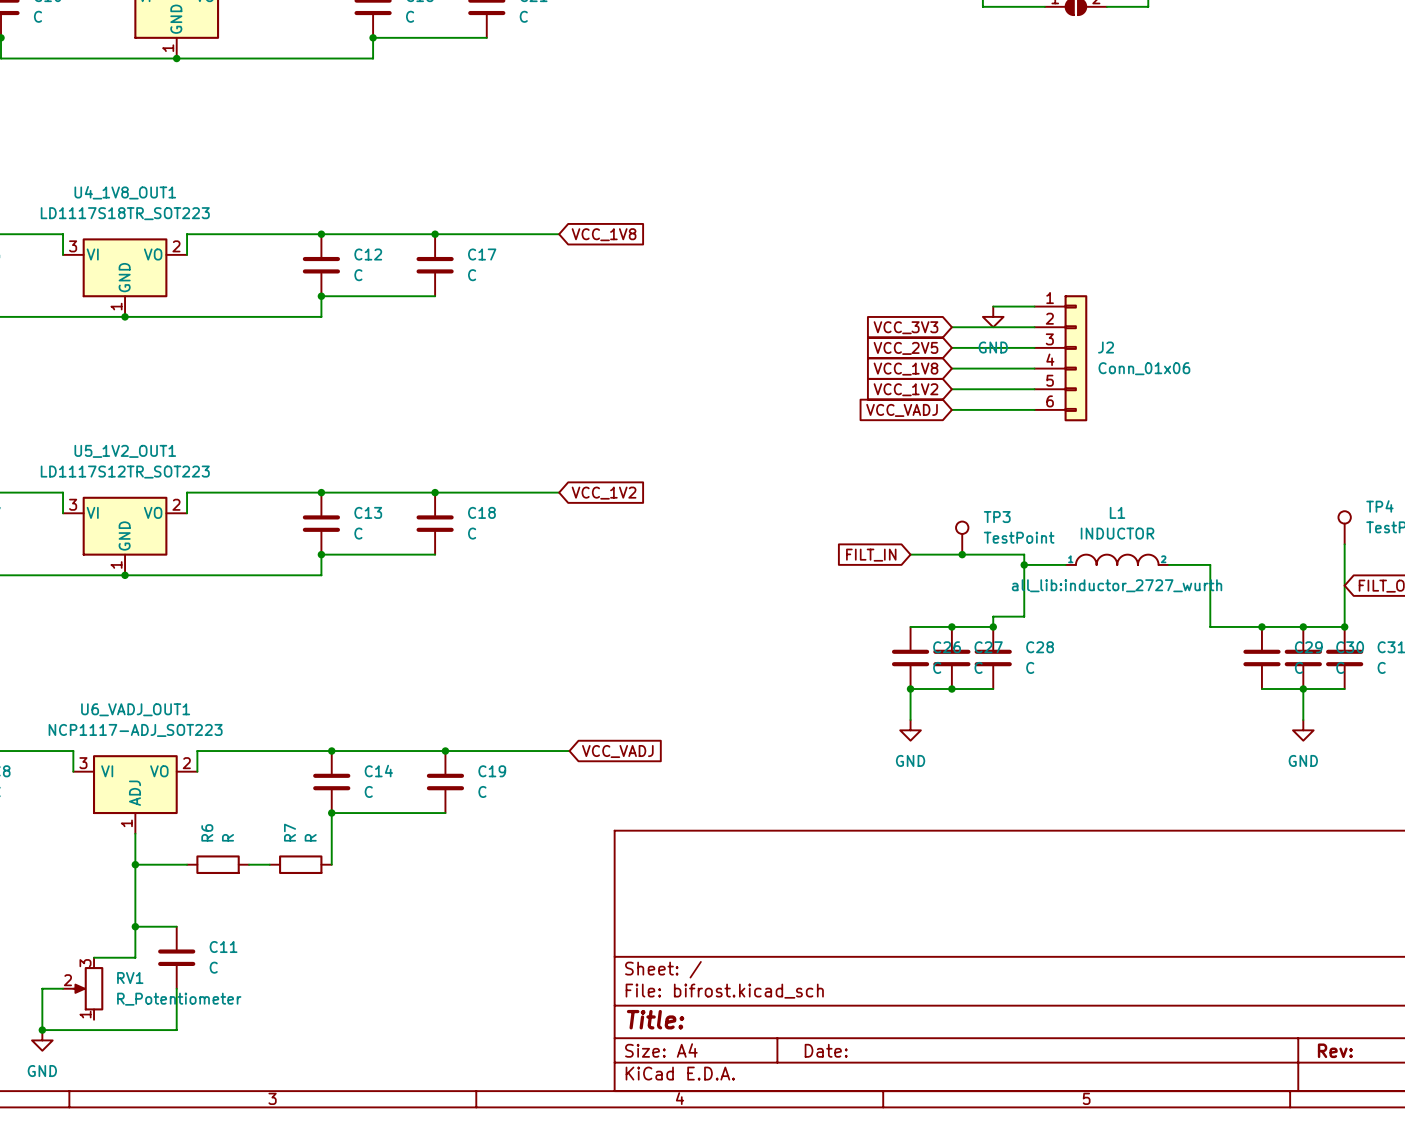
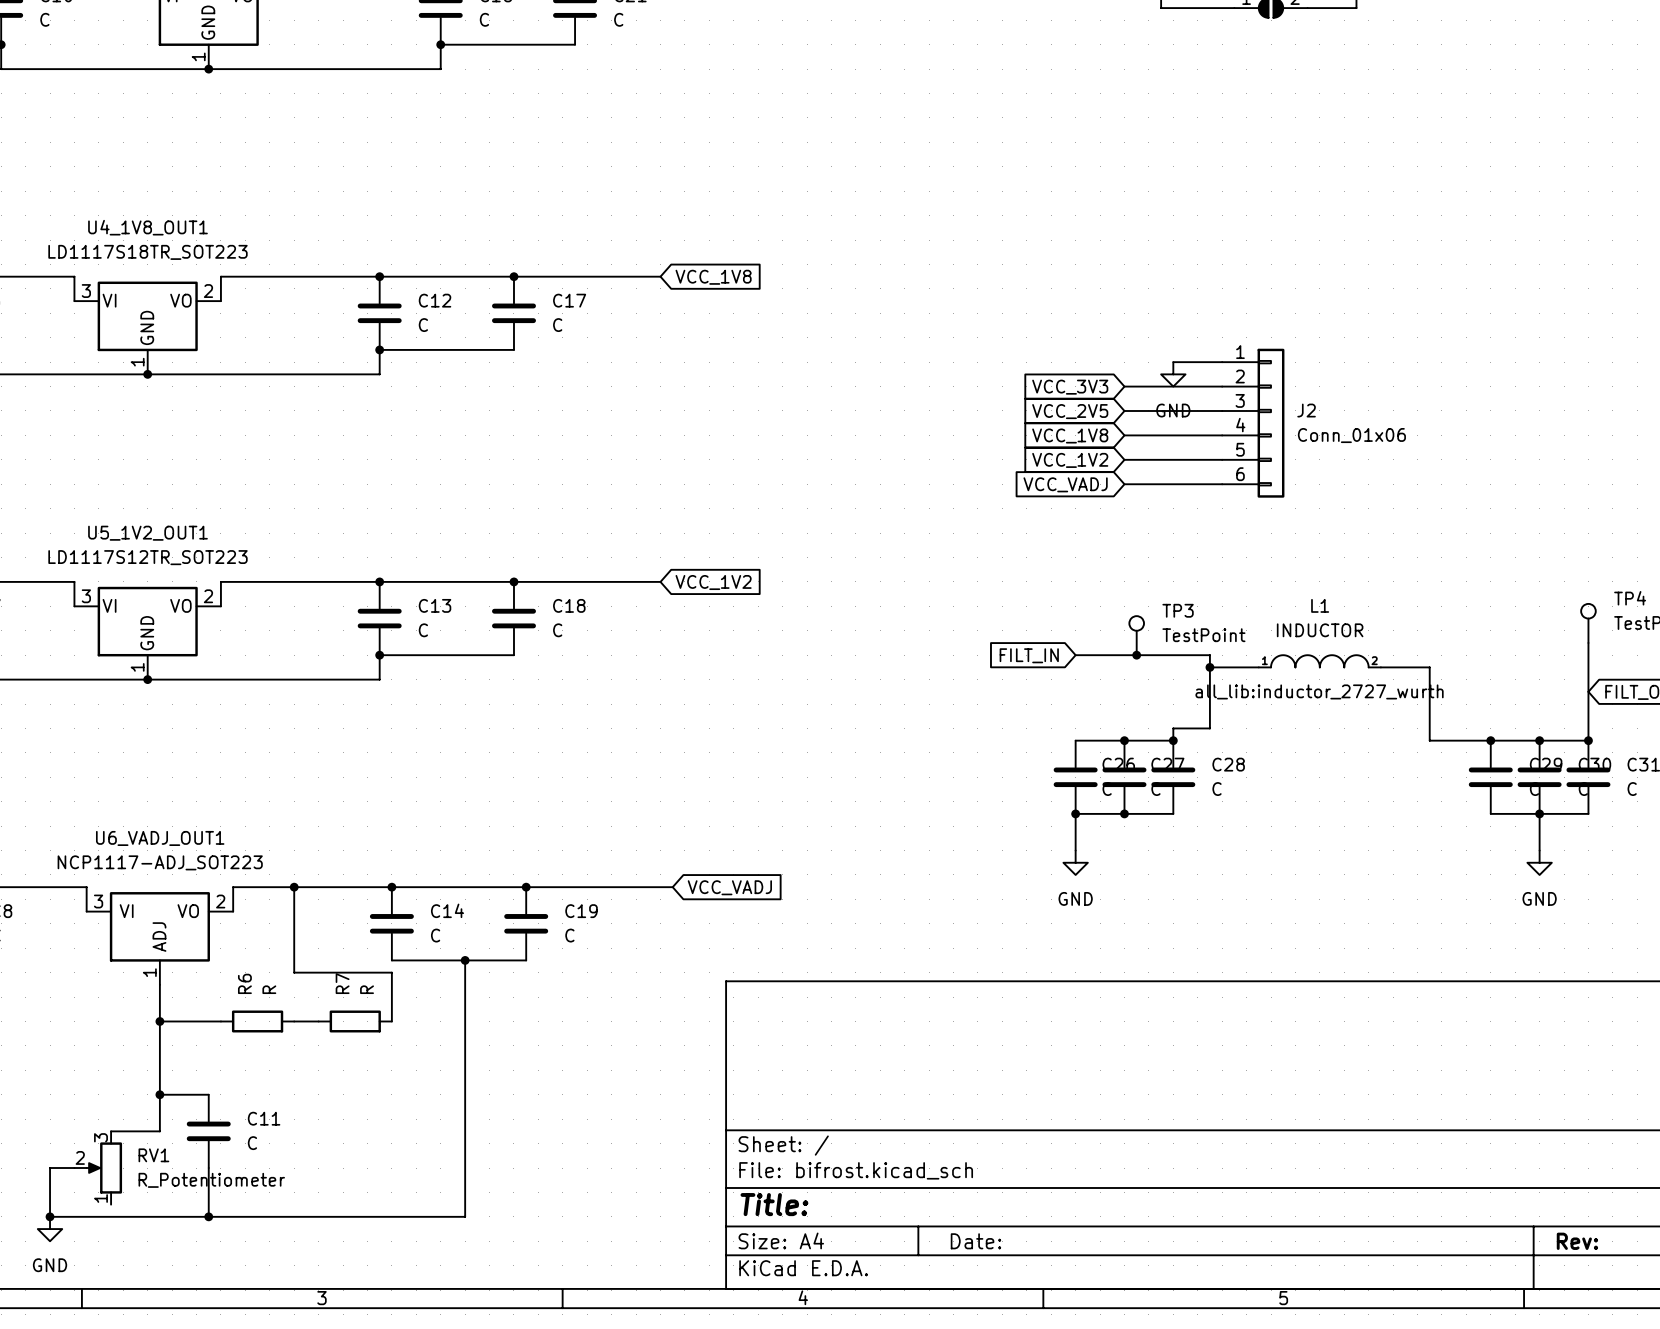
junction: none -> (294, 887)
wire: (331, 813) (331, 823) -> (294, 887) (294, 972) (391, 972)
junction: (331, 813) -> none
wire: none -> (465, 960) (465, 1216) (208, 1216)
junction: none -> (465, 960)
junction: none -> (208, 1216)

